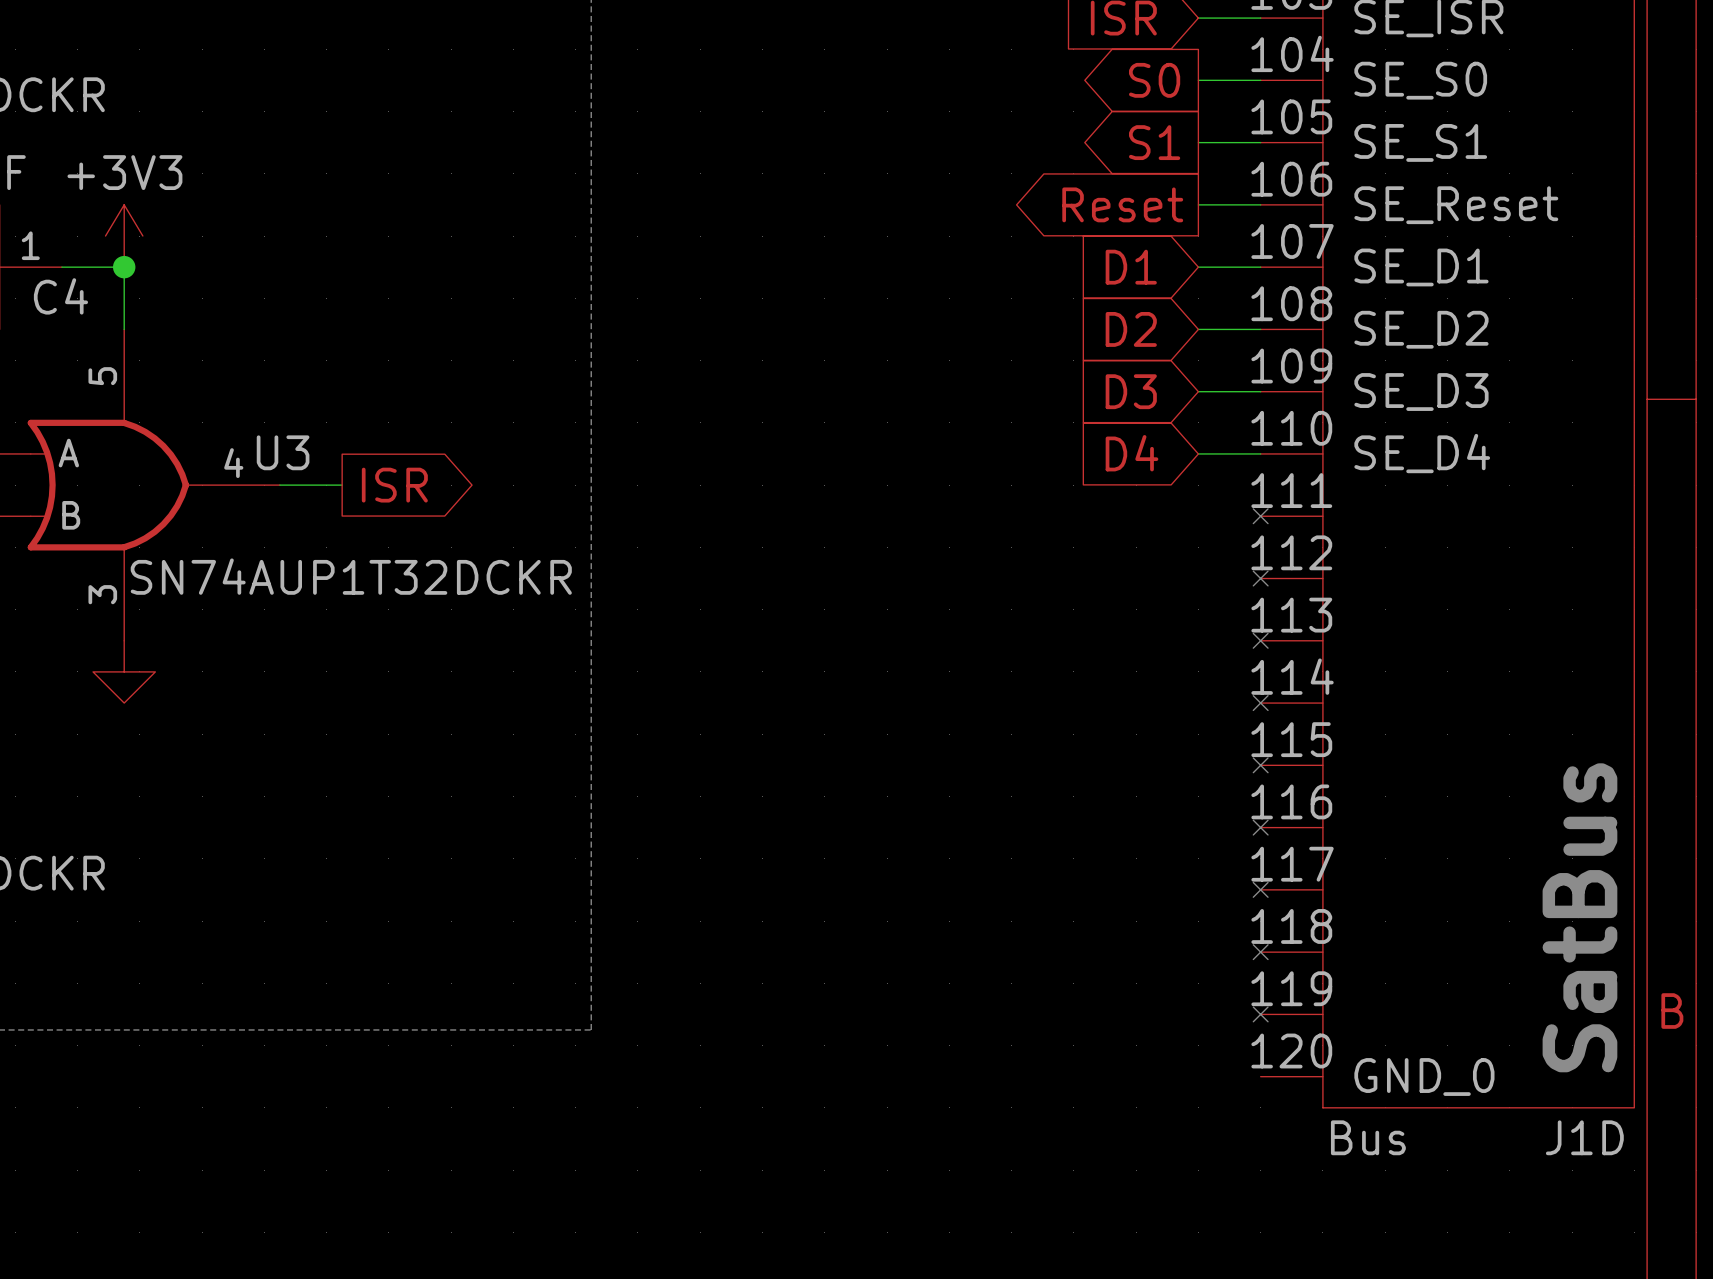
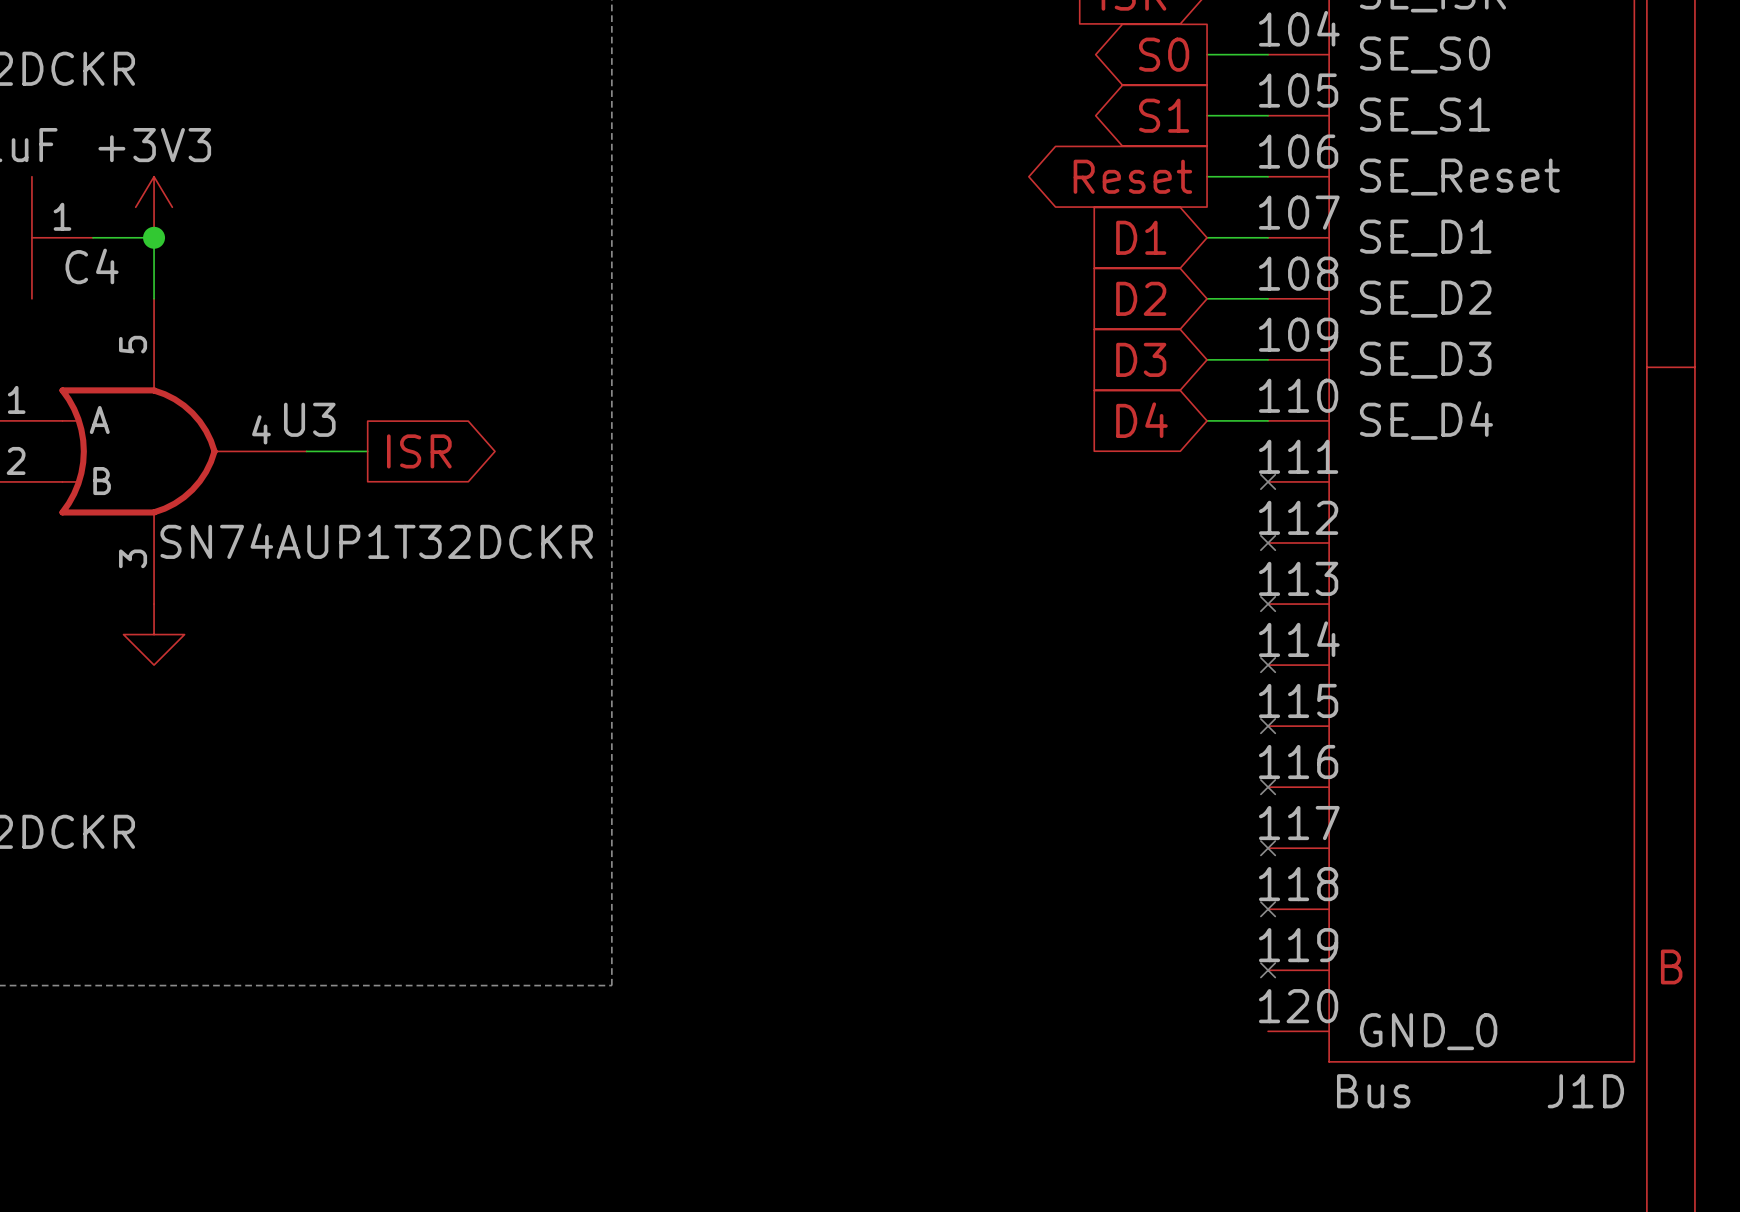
text: SatBus (1579, 917) -> none

